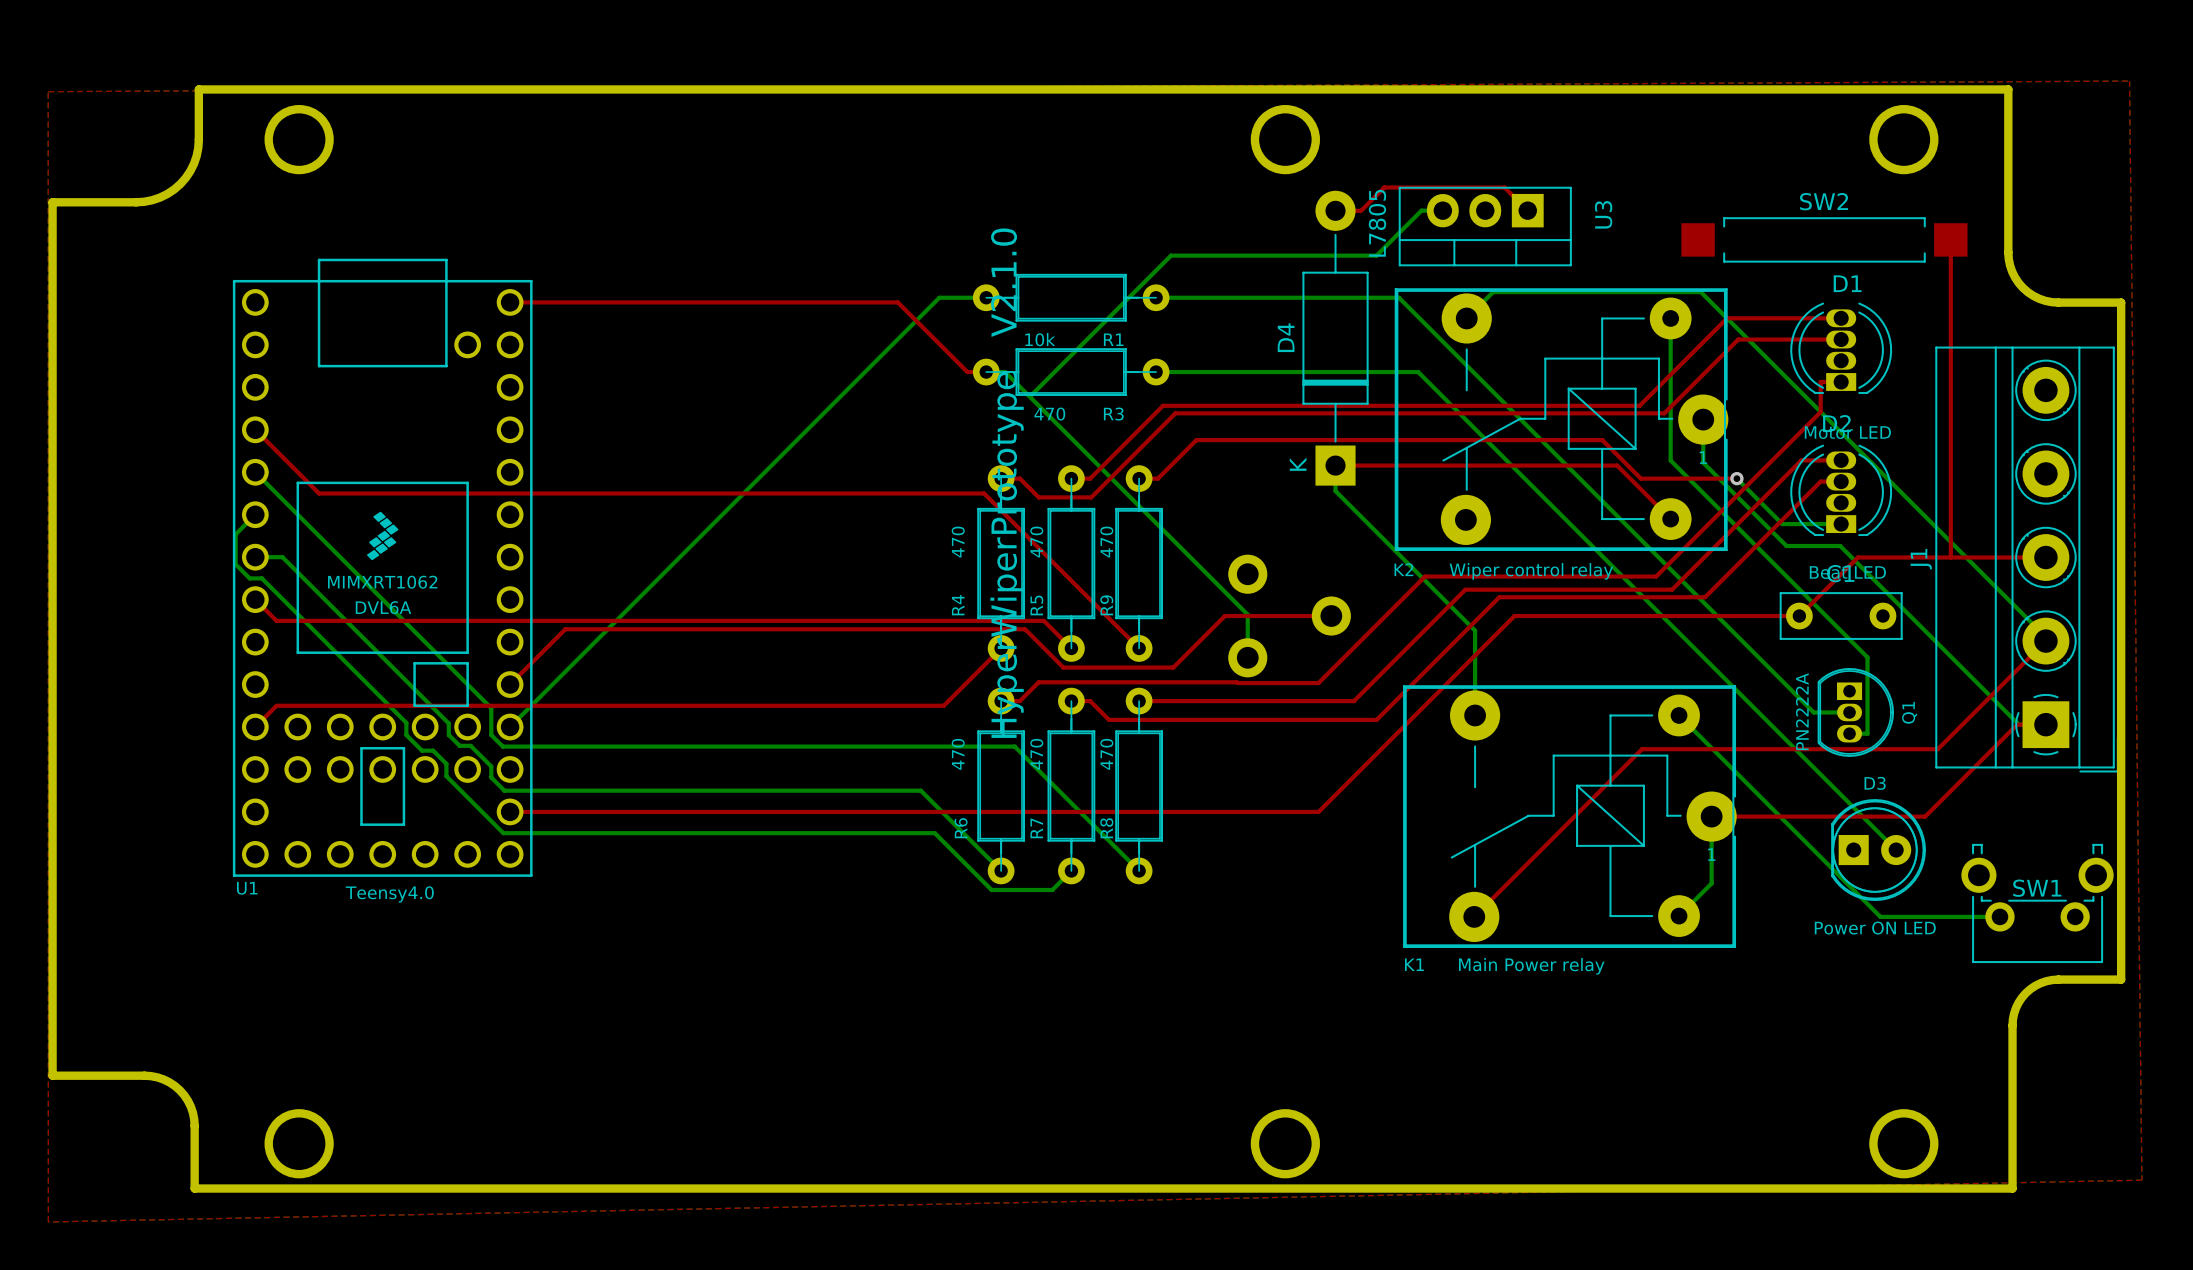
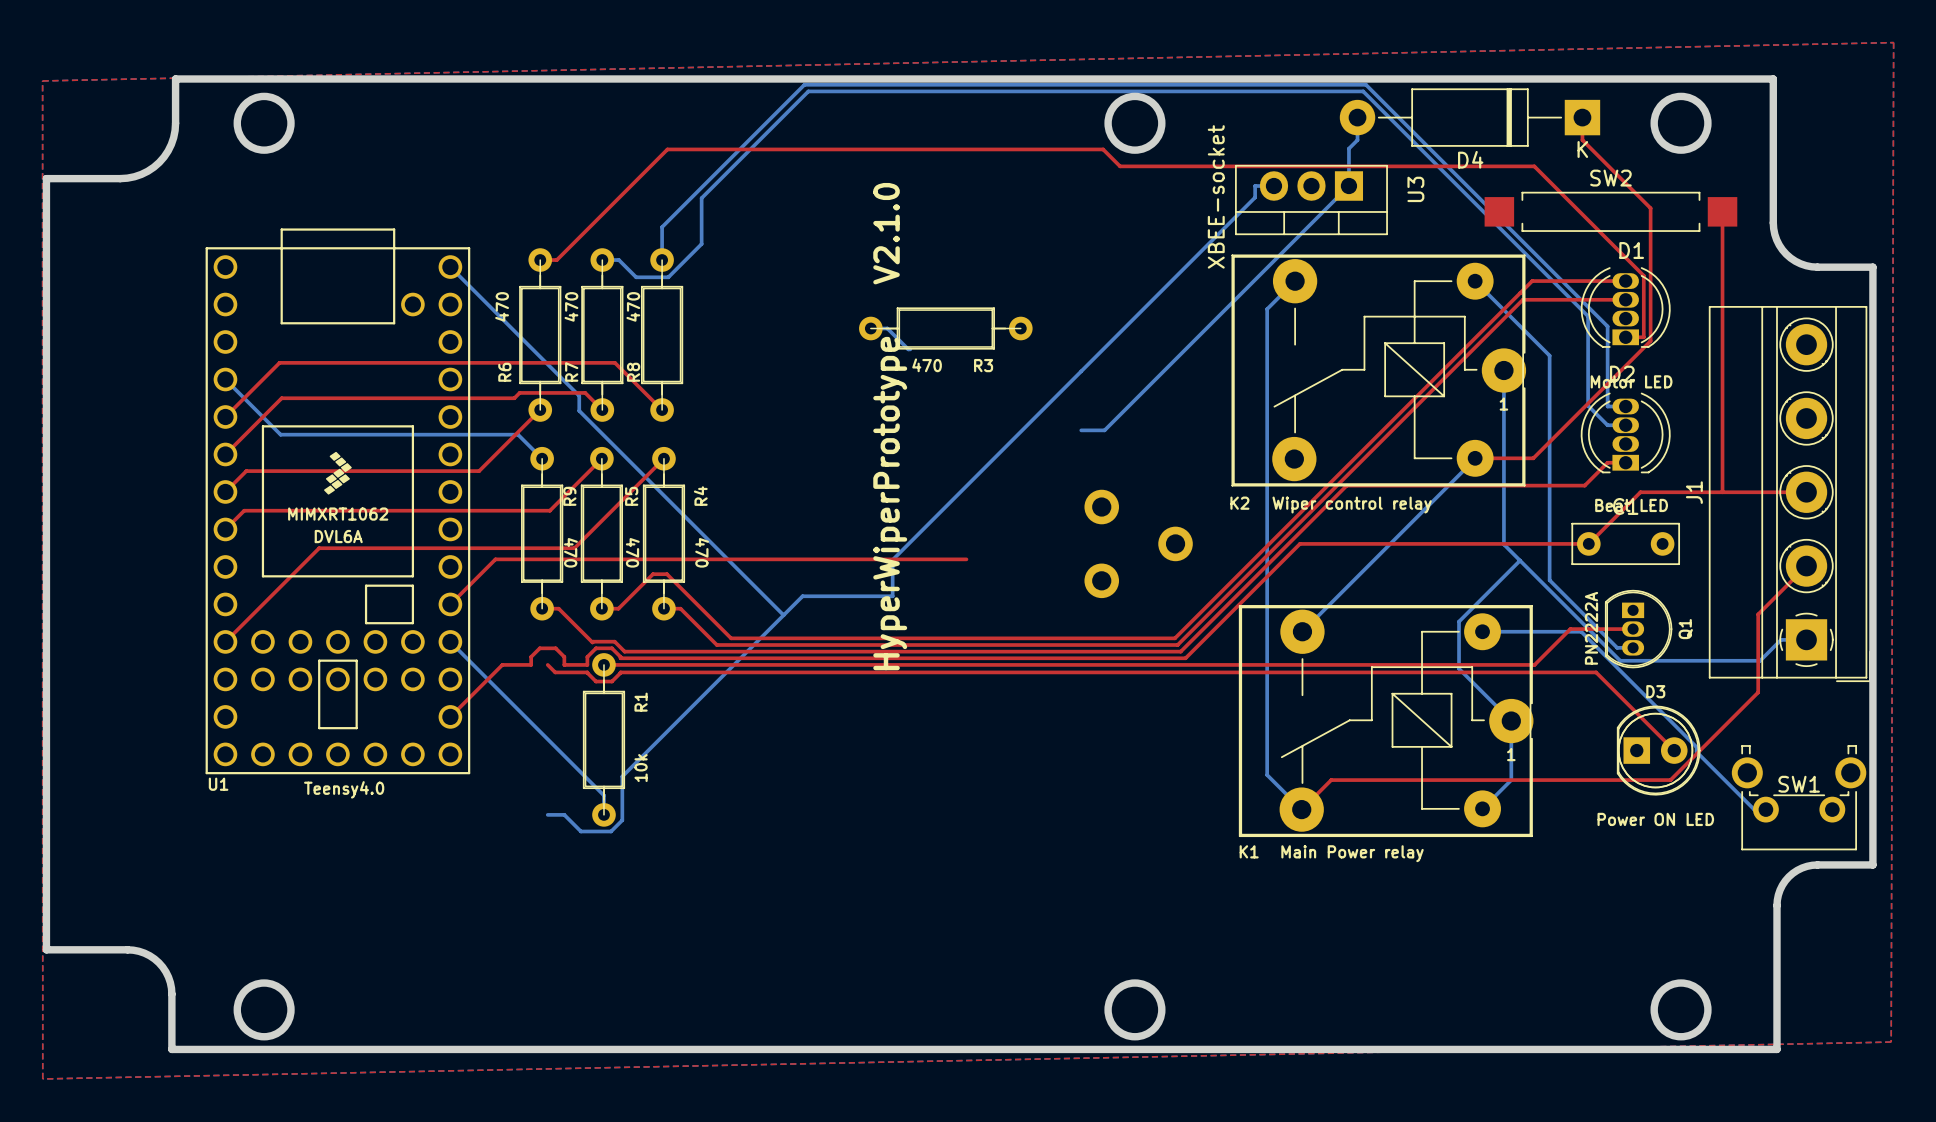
top zone outline: (48, 91) (2129, 81) (2141, 1180) -> (42, 80) (1893, 42) (1891, 1042)
bottom track: none -> (1357, 117) (1357, 140) (1348, 148) (1348, 186) (1104, 430) (1081, 430)
bottom track: (1421, 210) (1376, 255) (1171, 255) (1030, 395) (1030, 397) (1247, 614) (1247, 657) -> (1255, 186) (1255, 197) (892, 559) (892, 596) (802, 596) (622, 776) (622, 820) (611, 831) (580, 831) (564, 814) (547, 814)
top track: (1527, 210) (1504, 187) (1384, 187) (1361, 210) (1335, 210) -> none
U3 value: L7805 (1377, 223) -> XBEE-socket (1216, 196)
bottom track: none -> (602, 260) (618, 260) (636, 277) (668, 277) (701, 244) (701, 198) (808, 91) (1363, 91) (1588, 316) (1588, 405) (1607, 425) (1625, 425)
bottom track: none -> (662, 260) (662, 227) (804, 84) (1365, 84) (1607, 326) (1607, 406) (1625, 406)
bottom track: (986, 297) (939, 297) (510, 727) -> (603, 814) (603, 795) (450, 641)
R1 rotation: 0° (1071, 297) -> 90° clockwise (603, 739)
R1 position: (1071, 297) -> (603, 739)
bottom track: (1156, 297) (1398, 297) (1813, 712) (1849, 712) -> none
top track: (510, 302) (897, 302) (967, 372) (986, 372) -> none
bottom track: none -> (450, 267) (579, 395) (579, 410) (783, 615)
bottom track: (1466, 318) (1493, 292) (1700, 292) (2045, 637) (2045, 641) -> (1295, 281) (1267, 309) (1267, 775) (1301, 809)
bottom track: (1670, 318) (1670, 460) (1867, 657) (1867, 733) (1849, 733) -> (1475, 281) (1549, 355) (1549, 580) (1617, 647) (1633, 647)
top track: (1735, 318) (1727, 318) (1639, 405) (1163, 405) (1090, 478) (1071, 478) -> (1532, 281) (1174, 638) (731, 638) (666, 574) (653, 574) (618, 608) (601, 608)
D4 rotation: 0° (1335, 338) -> 90° counterclockwise (1469, 117)
D4 position: (1335, 338) -> (1469, 117)
R1 value position: 10k (1040, 339) -> 10k (641, 768)
R1 name position: R1 (1113, 339) -> R1 (641, 702)
top track: (1738, 339) (1664, 413) (1175, 413) (1091, 497) (1038, 497) (1019, 478) (1001, 478) -> (1534, 299) (1522, 299) (1177, 645) (716, 645) (680, 608) (663, 608)
bottom track: (1156, 372) (1418, 372) (1896, 850) -> none
top track: (1841, 381) (1820, 381) (1820, 412) (1656, 576) (1425, 576) (1318, 683) (1038, 682) (1019, 701) (1001, 701) -> (1625, 337) (1643, 337) (1643, 275) (1534, 166) (1120, 166) (1103, 149) (667, 149) (556, 260) (540, 260)
top track: (255, 429) (319, 493) (984, 493) (1139, 648) -> none
bottom track: none -> (225, 379) (280, 434) (518, 434) (542, 458)
top track: (1841, 460) (1801, 460) (1672, 589) (1465, 589) (1353, 701) (1139, 701) -> none
bottom track: (1703, 462) (1786, 546) (1840, 546) (2017, 724) -> (1503, 408) (1503, 544) (1620, 660) (1760, 660) (1781, 639)
top track: none -> (540, 409) (479, 471) (246, 471) (225, 491)
top track: none -> (602, 409) (585, 392) (519, 392) (514, 398) (281, 398) (225, 454)
top track: none -> (662, 409) (614, 362) (279, 362) (225, 416)
top track: (1335, 465) (1617, 465) (1670, 519) -> (1582, 117) (1582, 140) (1650, 208) (1650, 341) (1533, 458) (1475, 458)
bottom track: (1335, 465) (1335, 491) (1475, 630) (1475, 715) -> (1475, 458) (1302, 631)
bottom track: (255, 472) (491, 708) (491, 735) (502, 746) (1014, 746) (1139, 870) -> none
top track: (1139, 478) (1157, 478) (1196, 440) (1602, 440) (1640, 478) (1736, 478) -> none
bottom track: (1736, 478) (1782, 524) (1841, 524) -> none
via: (1736, 478) -> none
top track: (1841, 481) (1820, 481) (1705, 597) (1499, 597) (1376, 719) (1109, 719) (1090, 701) (1071, 701) -> none
bottom track: (255, 514) (235, 534) (235, 564) (249, 578) (261, 578) (406, 722) (406, 735) (422, 750) (433, 750) (446, 763) (446, 776) (503, 833) (934, 833) (991, 889) (1052, 889) (1071, 870) -> none
top track: none -> (601, 458) (549, 510) (244, 510) (225, 529)
top track: none -> (1625, 462) (1607, 462) (1584, 485) (1346, 485) (1180, 651) (624, 651) (614, 641) (592, 642) (558, 608) (542, 608)
R4 value rotation: 0° (958, 542) -> 180° (702, 552)
R4 value position: 470 (958, 542) -> 470 (702, 552)
R5 value rotation: 0° (1036, 542) -> 180° (632, 552)
R5 value position: 470 (1036, 542) -> 470 (632, 552)
R9 value rotation: 0° (1106, 542) -> 180° (570, 552)
R9 value position: 470 (1106, 542) -> 470 (570, 552)
bottom track: (255, 557) (282, 557) (448, 723) (448, 734) (459, 745) (470, 745) (491, 766) (491, 777) (504, 790) (920, 790) (1001, 870) -> none
R4 position: (1001, 563) -> (663, 533)
R5 position: (1071, 563) -> (601, 533)
R9 position: (1139, 563) -> (542, 533)
top track: (255, 599) (276, 620) (361, 620) -> (244, 623) (319, 548)
R4 name position: R4 (958, 605) -> R4 (700, 496)
R5 name position: R5 (1036, 605) -> R5 (631, 496)
R9 name position: R9 (1106, 605) -> R9 (569, 496)
top track: (1331, 616) (1224, 616) (1173, 667) (1063, 667) (1025, 629) (565, 629) (561, 633) -> (966, 559) (495, 559)
top track: (1514, 616) (1318, 811) (510, 811) -> (1337, 543) (1299, 543) (1185, 658) (620, 658) (611, 648) (596, 648) (587, 656) (587, 664) (564, 664) (564, 656) (555, 648) (539, 648) (531, 656) (531, 664) (502, 664) (450, 716)
top track: (650, 620) (1043, 620) (1071, 648) -> (574, 548) (663, 458)
bottom track: none -> (1520, 560) (1459, 621) (1459, 668) (1511, 721)
top track: (1001, 648) (943, 705) (276, 705) -> none
top track: (1991, 695) (1937, 749) (1641, 749) (1507, 883) -> (1758, 614) (1758, 692) (1670, 780) (1331, 780)
top track: none -> (1633, 629) (1570, 629) (1534, 664) (603, 664)
bottom track: (1679, 715) (1880, 916) (1986, 916) -> (1482, 631) (1581, 631) (1696, 747) (1696, 752) (1754, 809)
top track: (2045, 724) (2017, 724) (1925, 816) (1711, 816) -> none
top track: none -> (547, 664) (555, 672) (587, 672) (596, 681) (611, 681) (620, 672) (1596, 672) (1674, 750)
R6 position: (1001, 786) -> (540, 335)
R7 position: (1071, 786) -> (602, 335)
R8 position: (1139, 786) -> (662, 335)

